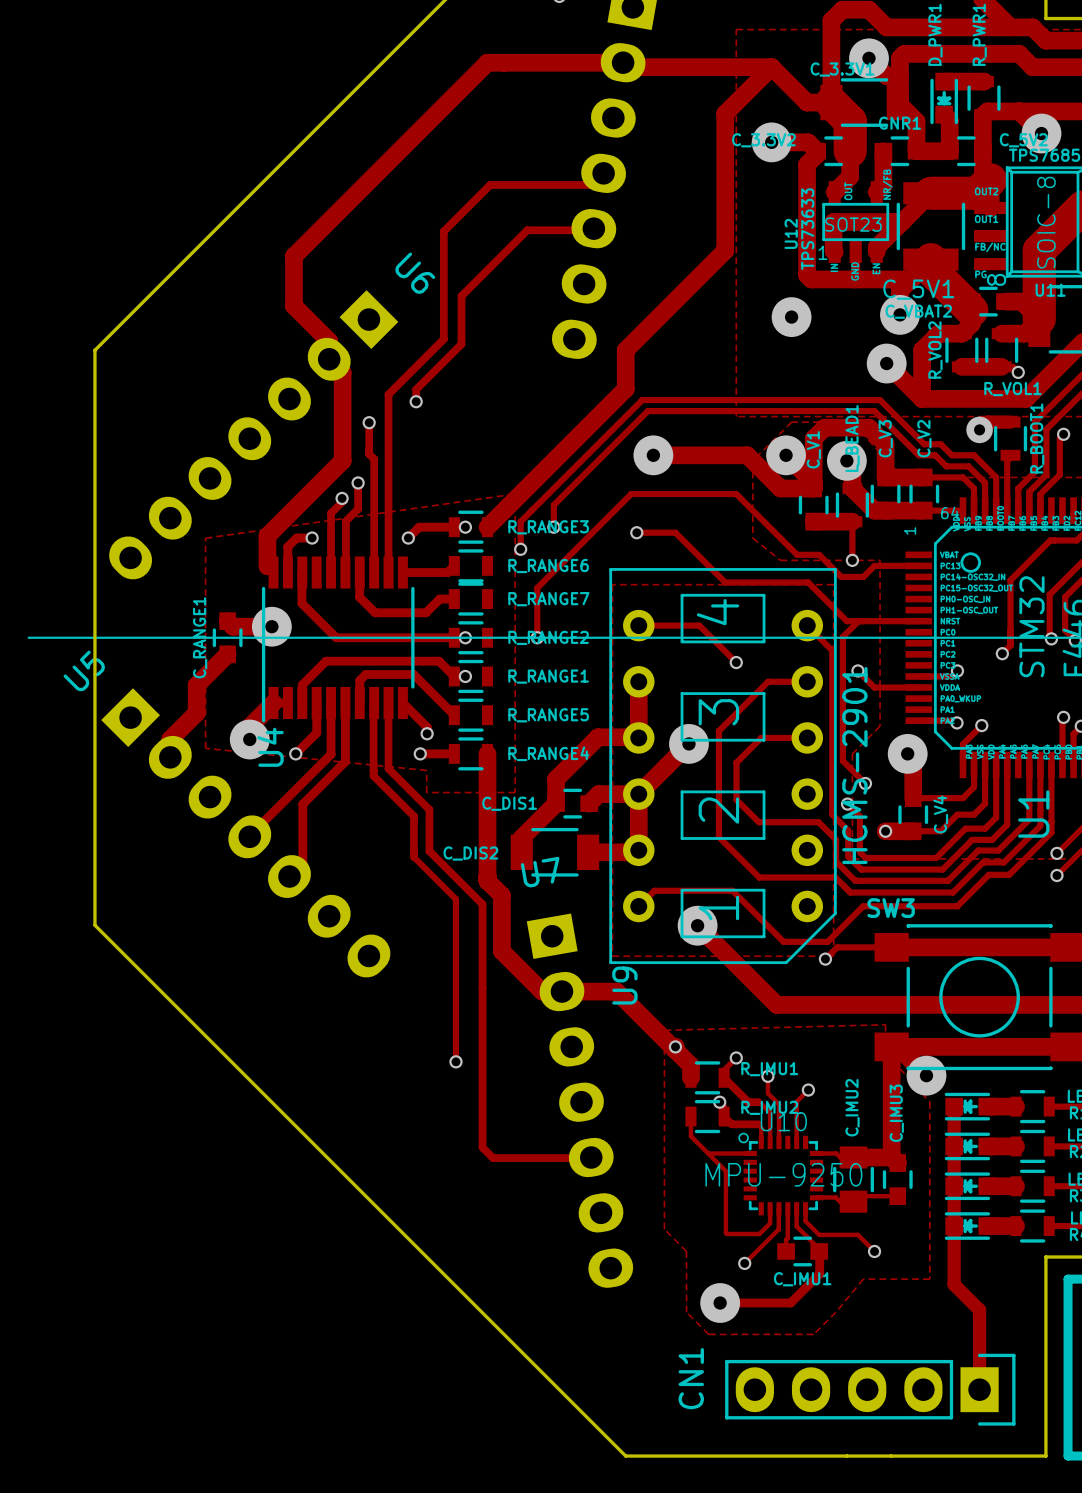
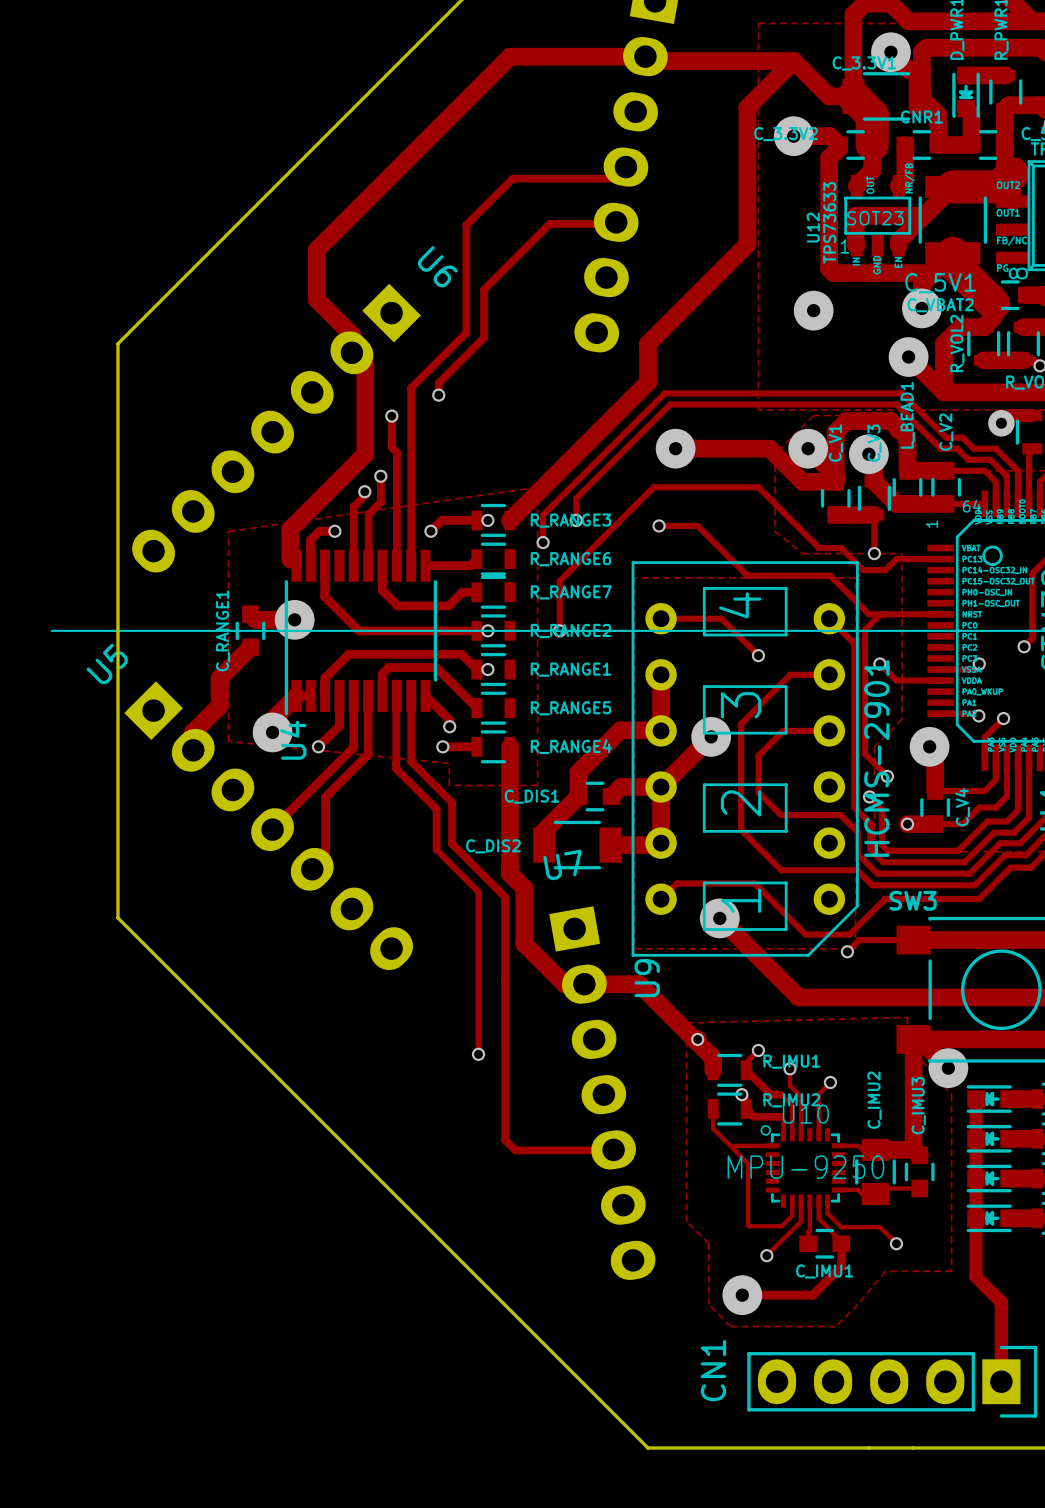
L_BEAD1 name position: L_BEAD1 (852, 438) -> L_BEAD1 (907, 415)
C_V3 name position: C_V3 (885, 438) -> C_V3 (874, 443)

